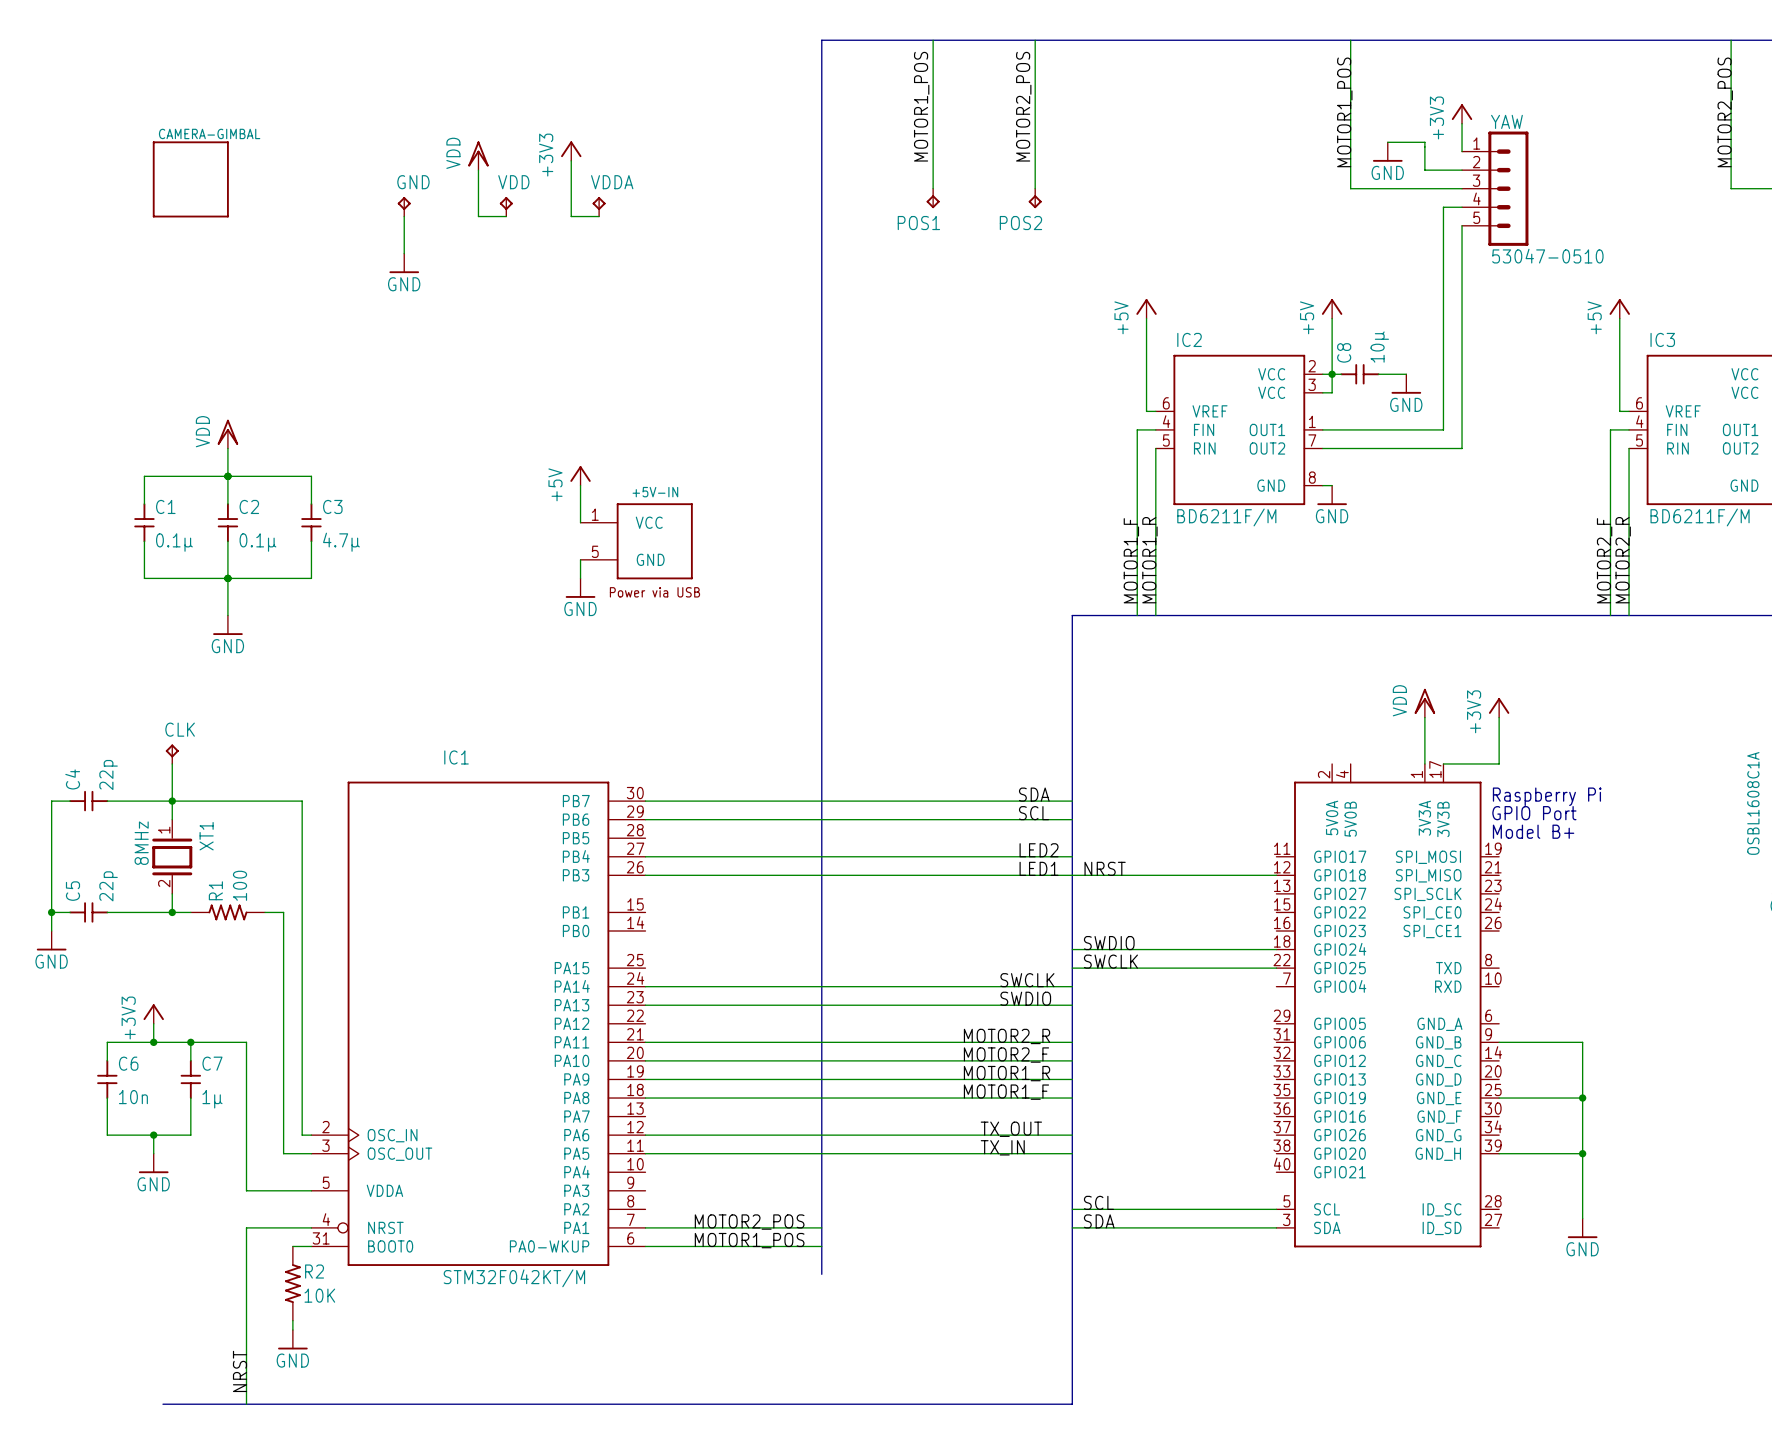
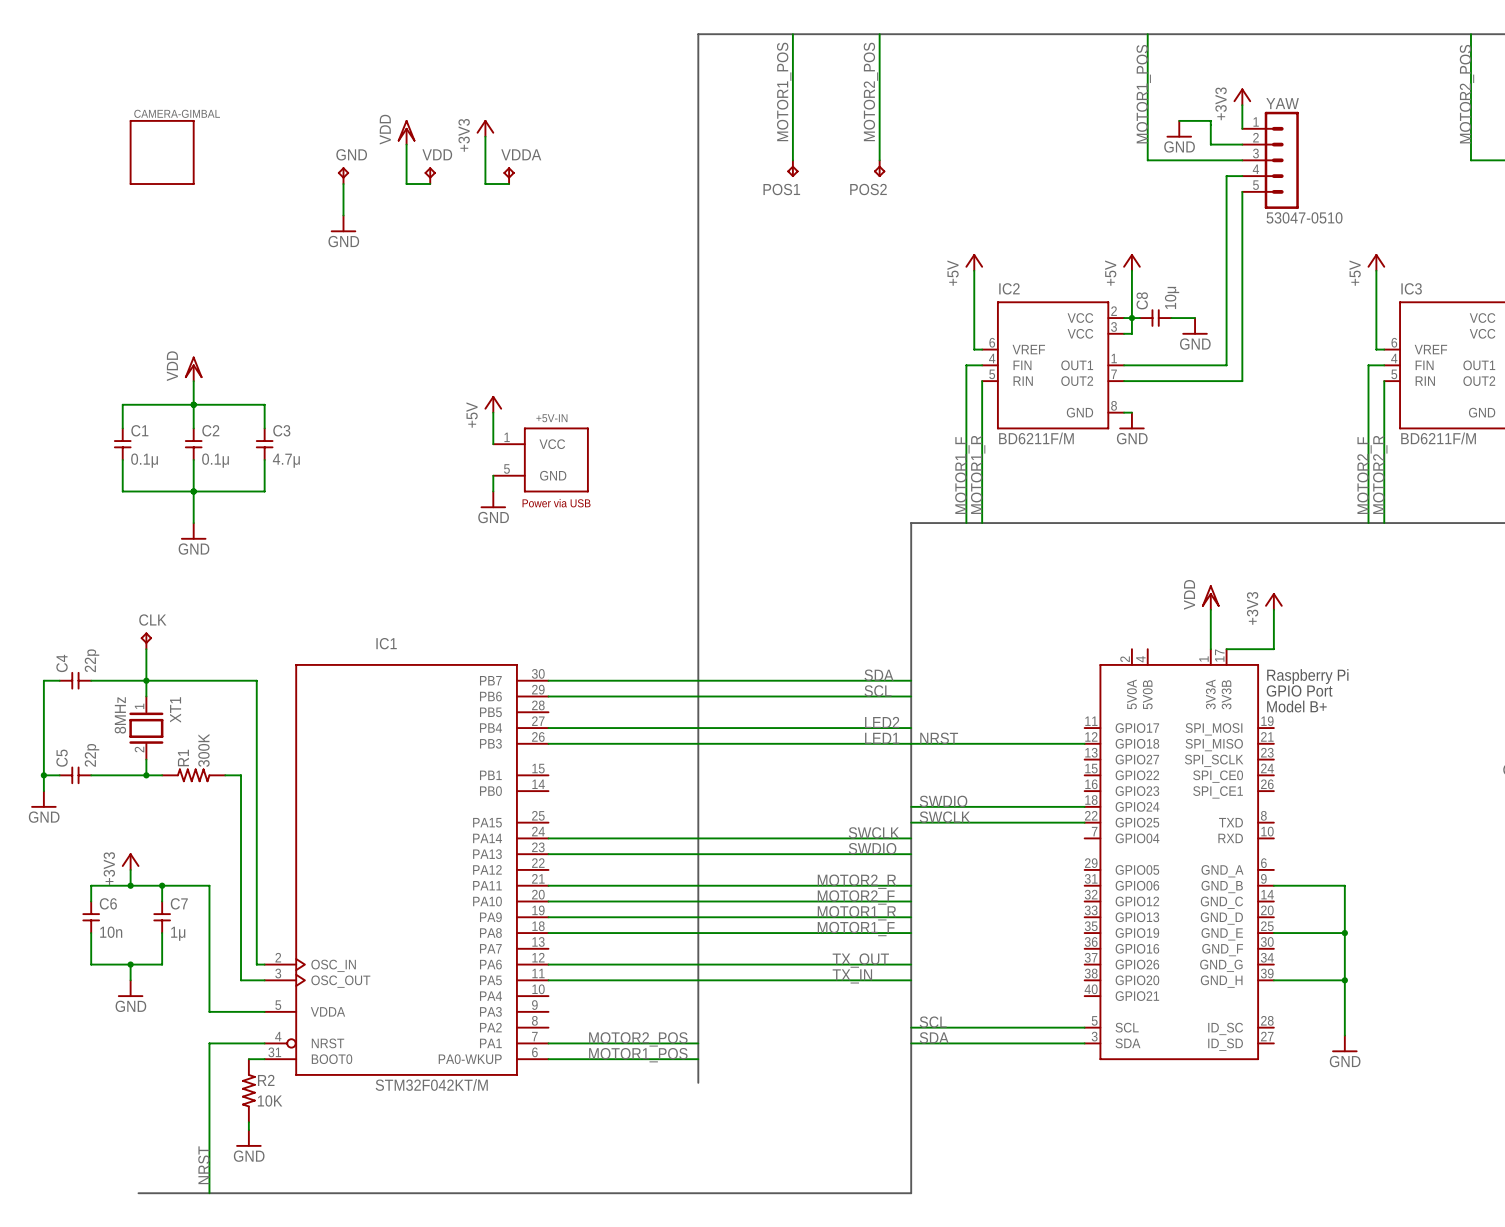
text: OSBL1608C1A (1753, 803) -> none
R1 value: 100 (240, 885) -> 300K (203, 750)

